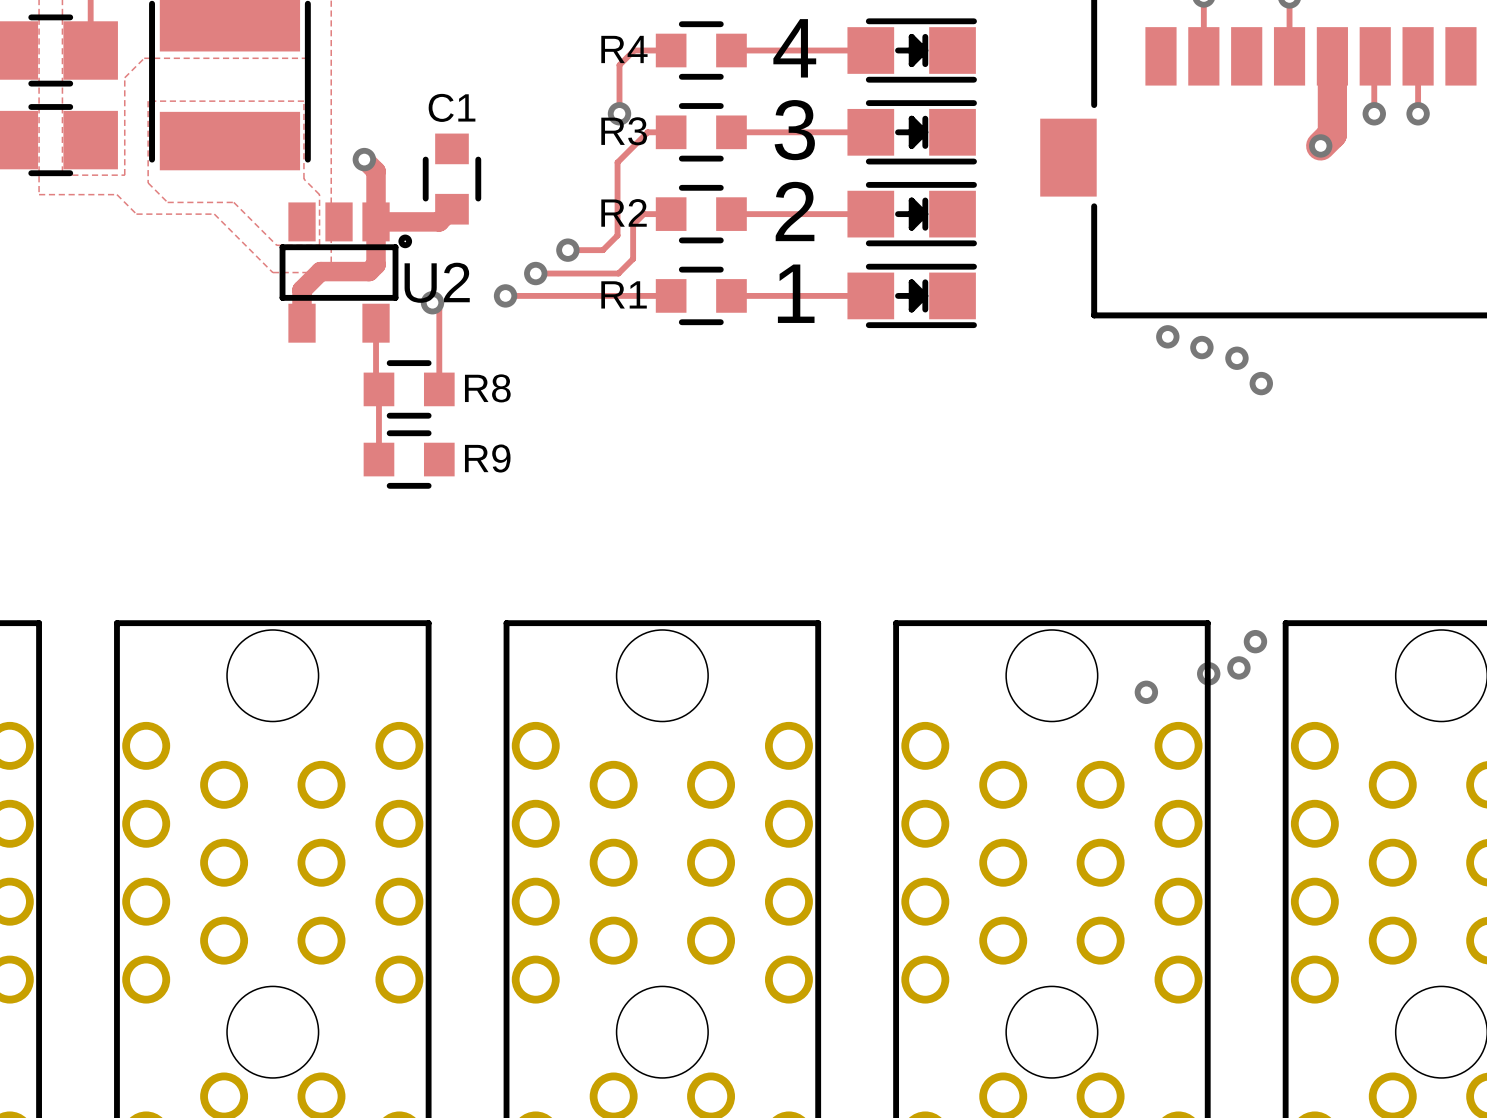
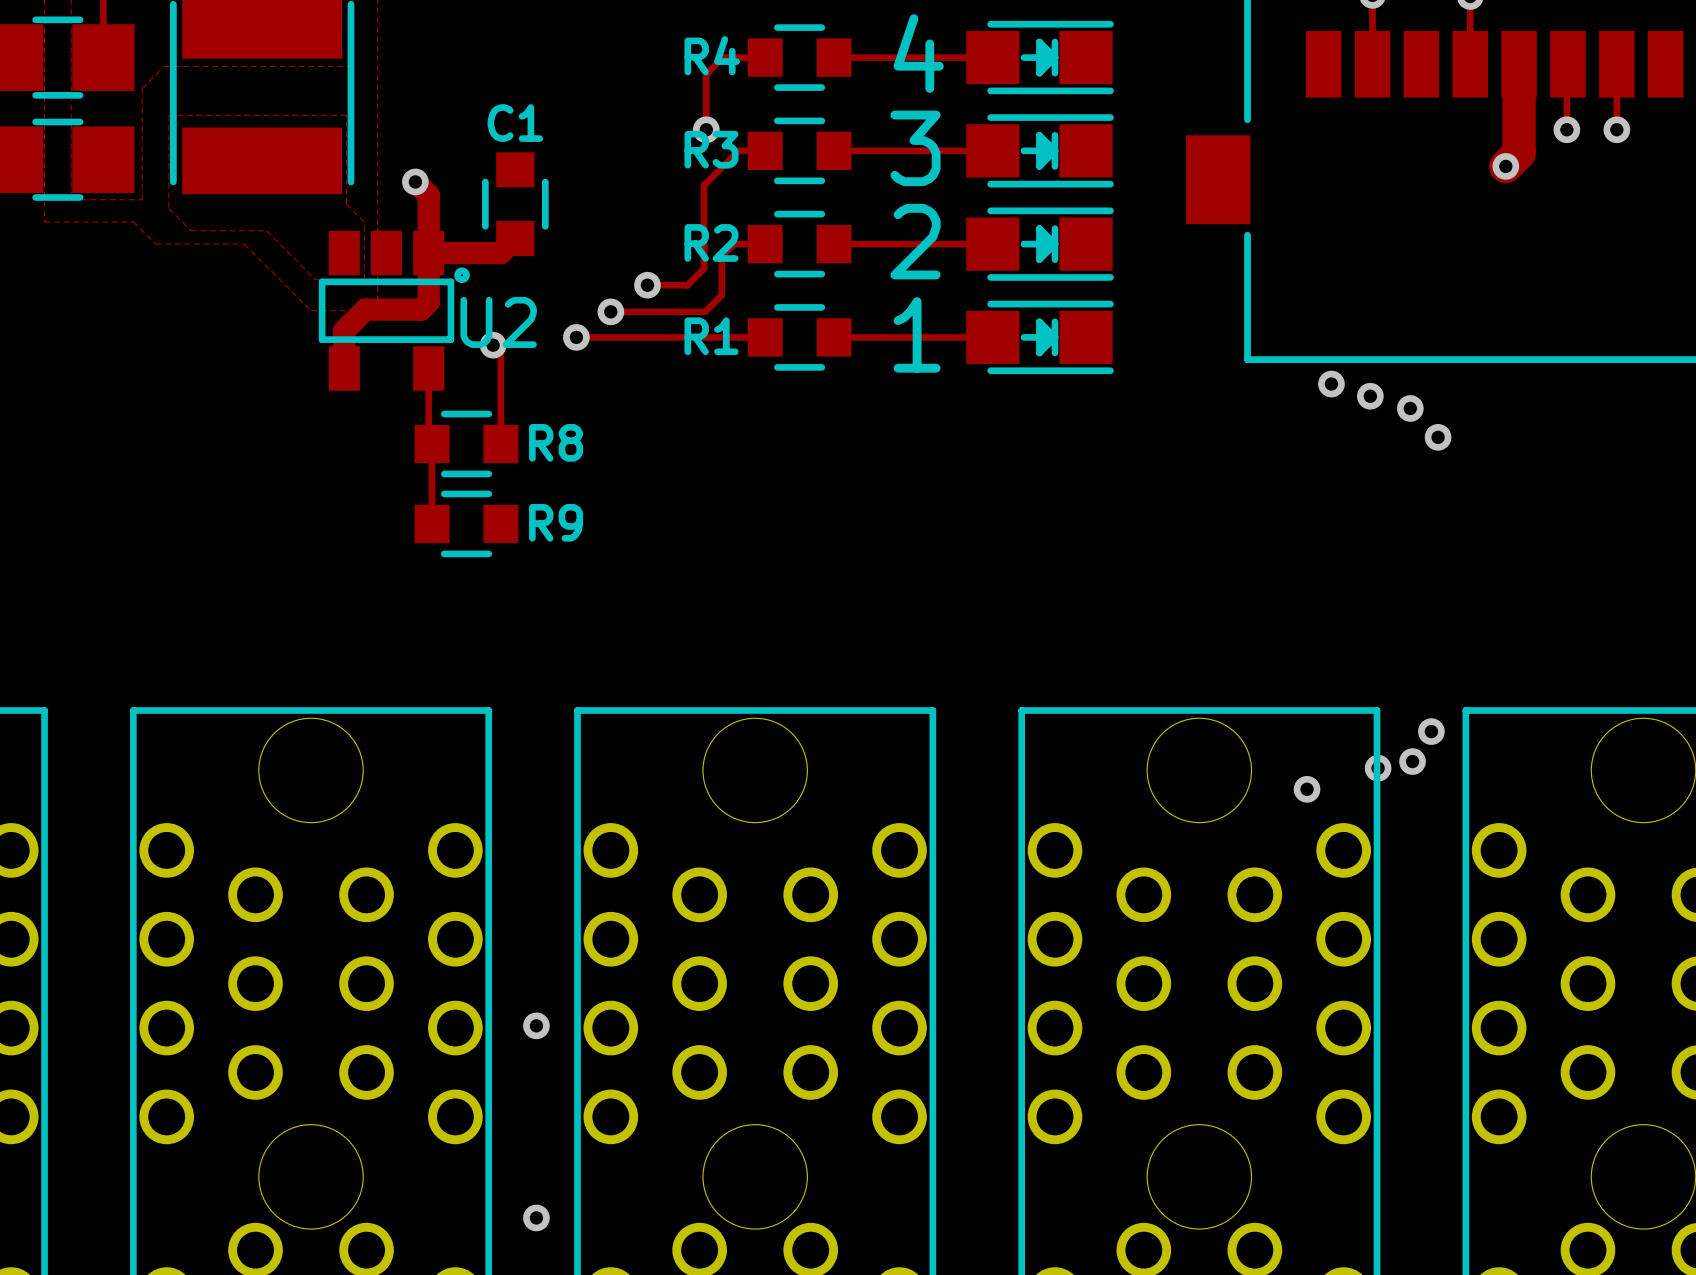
via: none -> (536, 1025)
via: none -> (536, 1217)

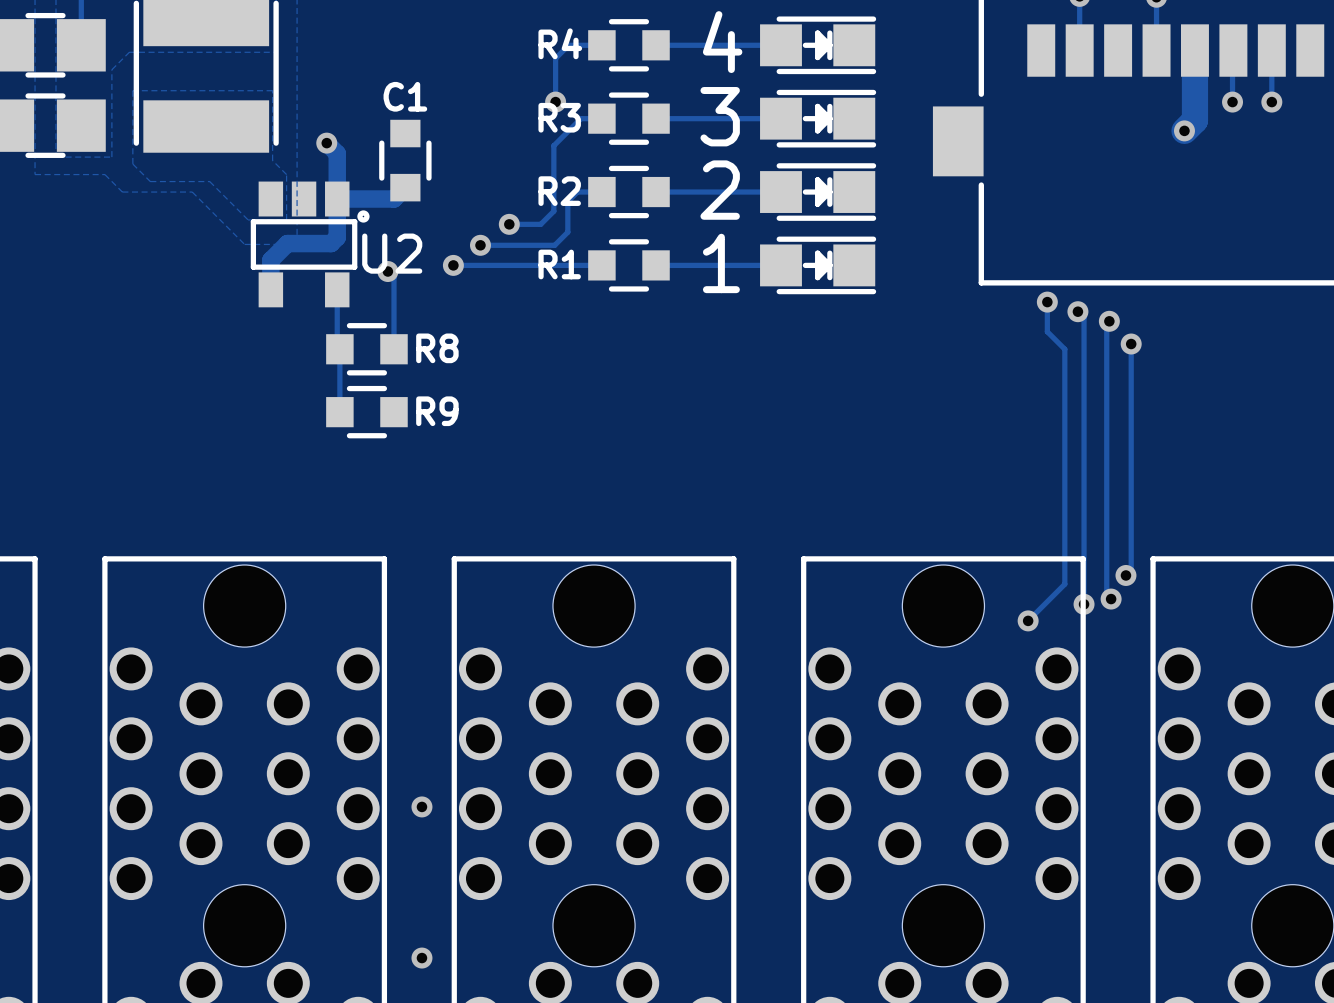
track: none -> (1047, 302) (1047, 331) (1064, 349) (1064, 584) (1028, 620)
track: none -> (1077, 311) (1084, 317) (1084, 604)
track: none -> (1109, 321) (1106, 323) (1106, 594)
track: none -> (1131, 344) (1131, 570) (1125, 575)

